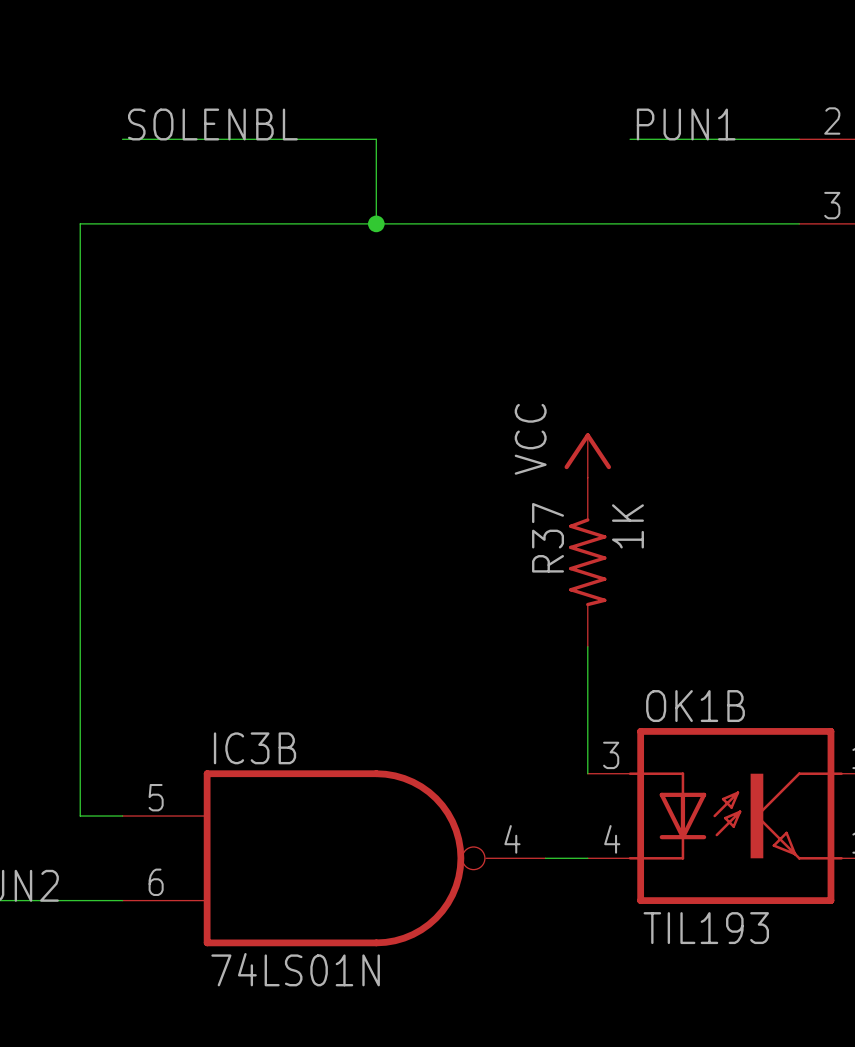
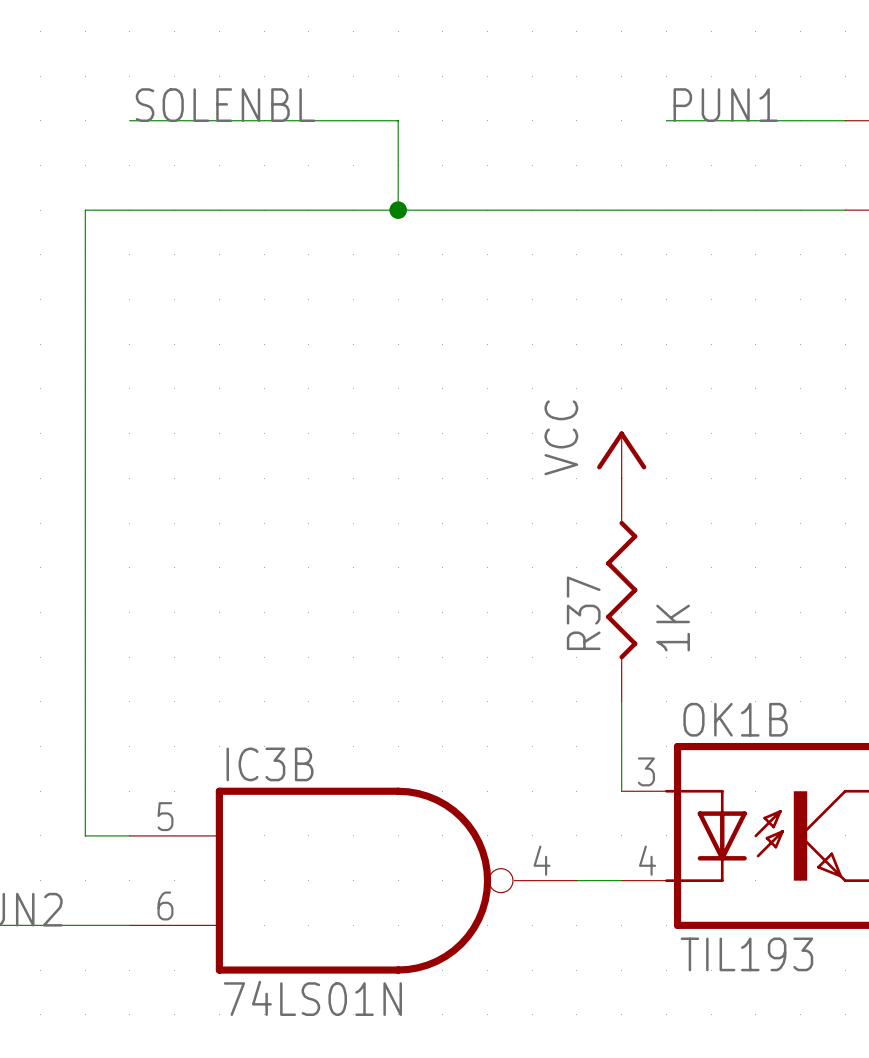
R37 symbol: [569, 477, 607, 647] -> [606, 478, 638, 702]
R37 value position: 1K (627, 526) -> 1K (673, 628)
R37 name position: R37 (548, 537) -> R37 (583, 613)

